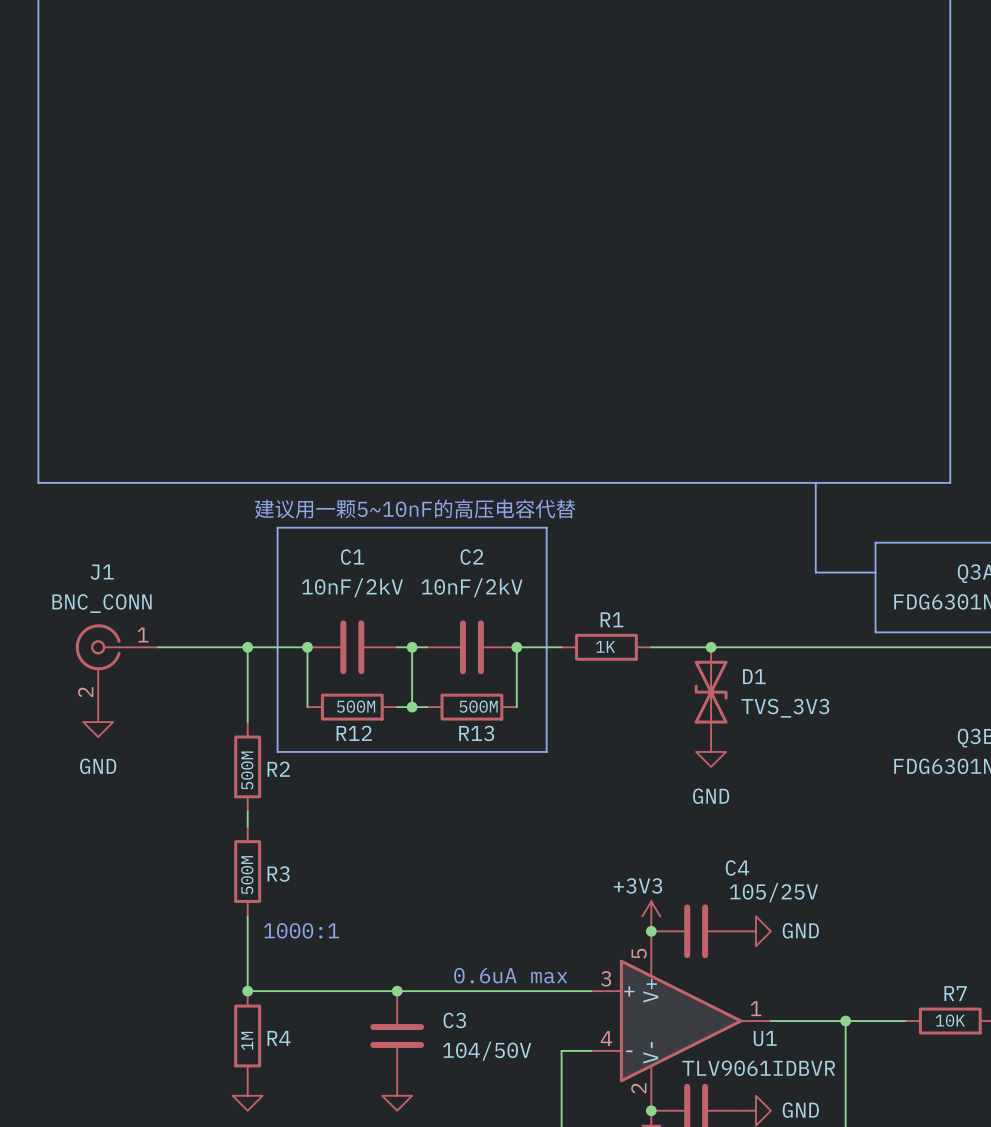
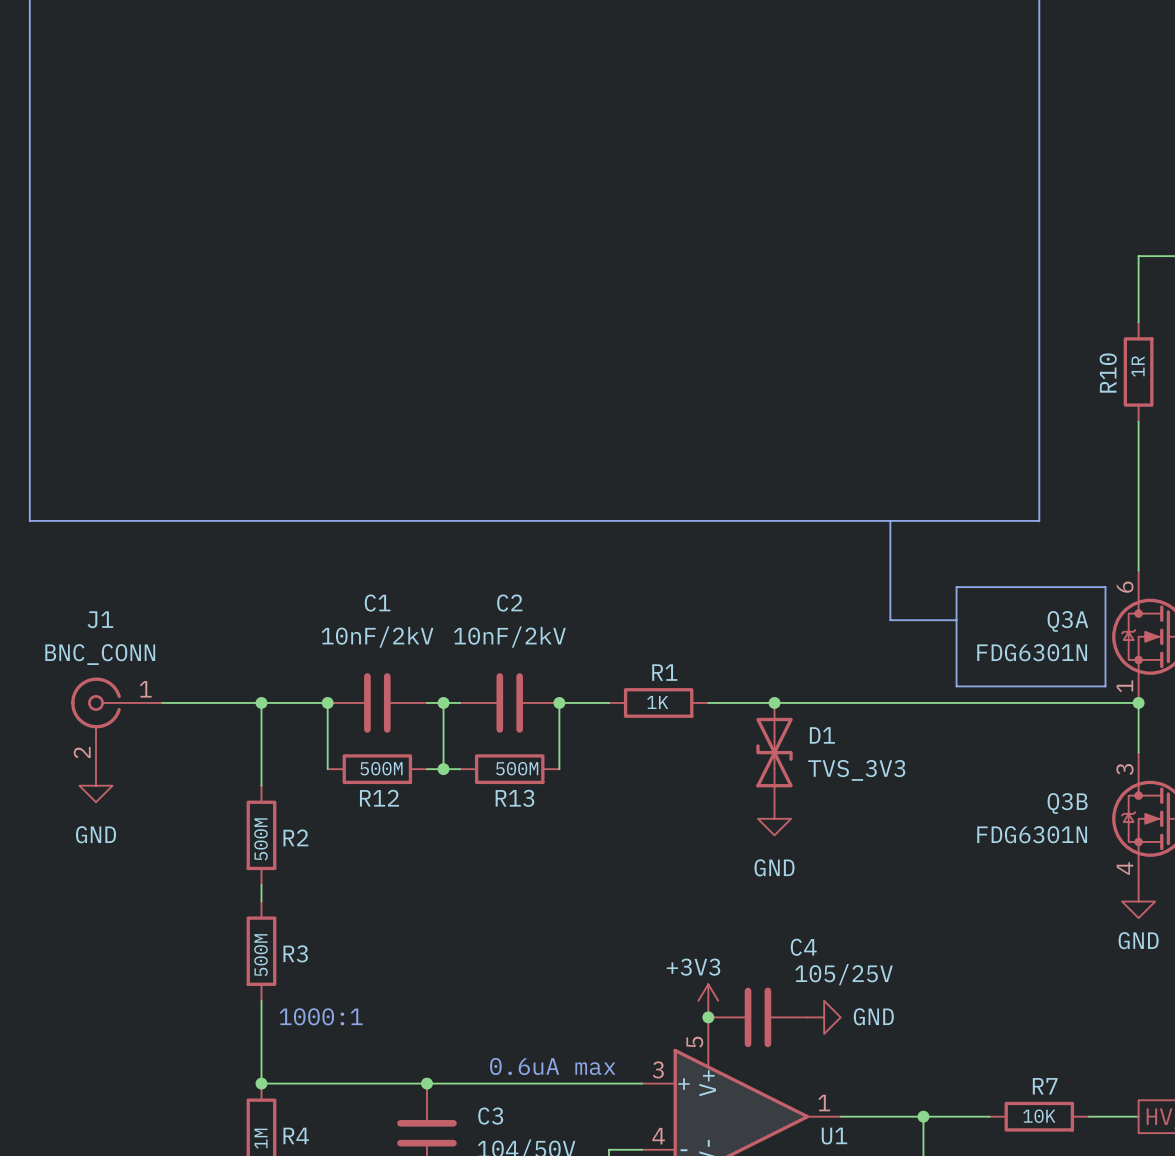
text: 建议用一颗5~10nF的高压电容代替 (415, 509) -> none
line: (277, 527) (546, 527) (546, 751) (277, 751) (277, 527) -> none

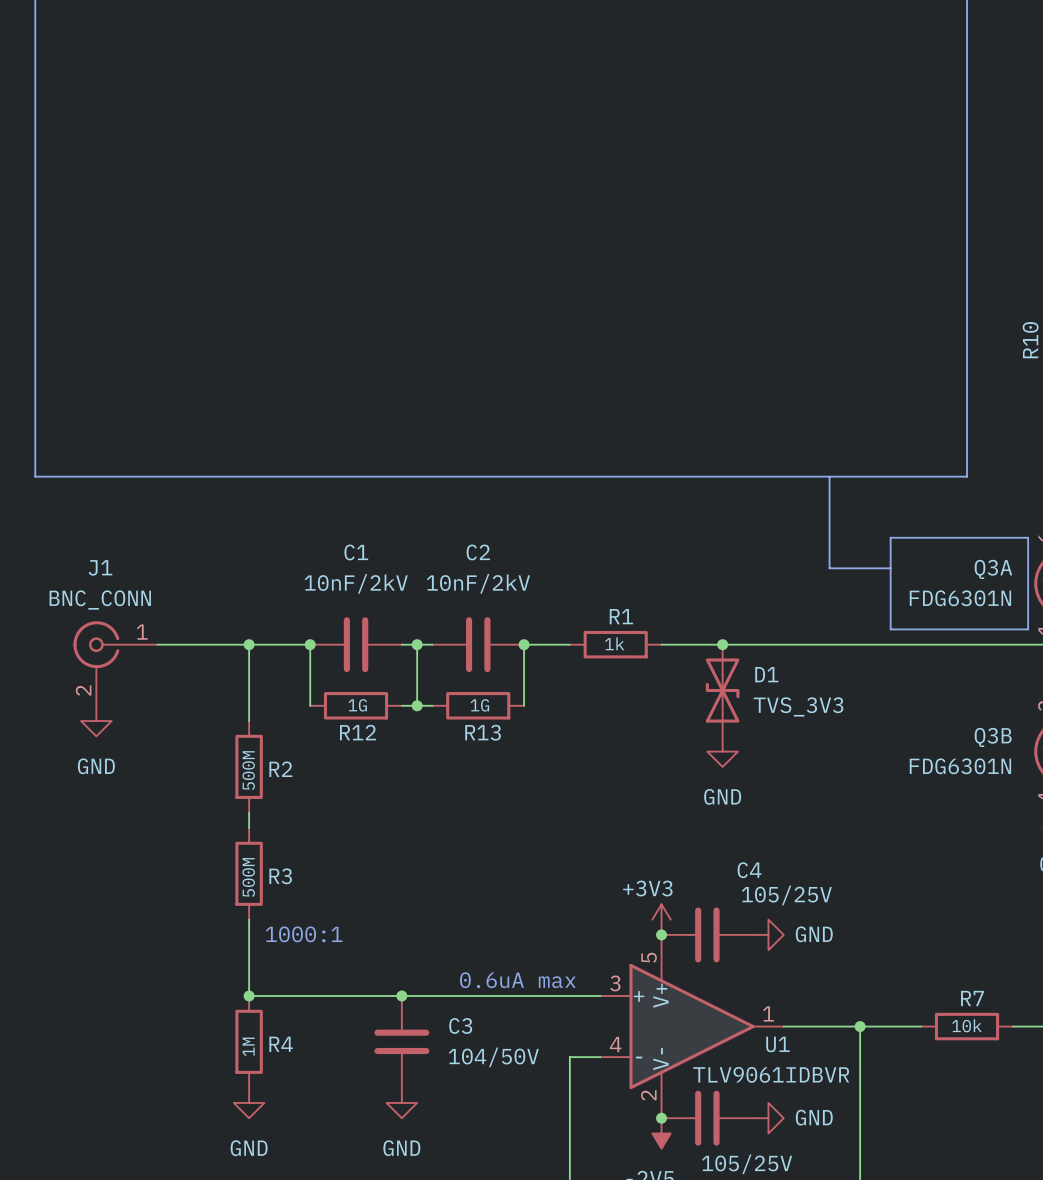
R1 value: 1K (657, 702) -> 1k (614, 643)
R12 value: 500M (381, 768) -> 1G (357, 705)
R13 value: 500M (517, 768) -> 1G (479, 705)
R7 value: 10K (1039, 1116) -> 10k (967, 1025)

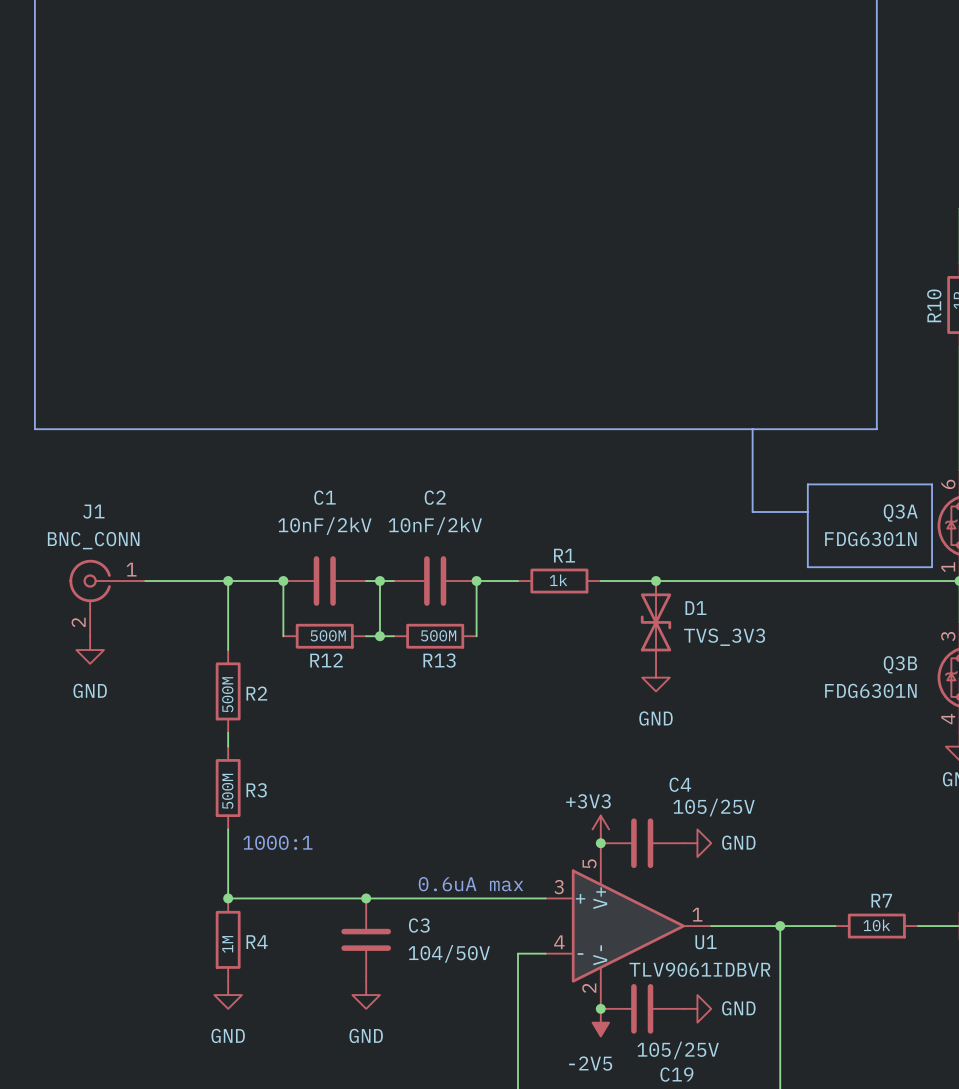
R12 value: 1G (357, 705) -> 500M (328, 635)
R13 value: 1G (479, 705) -> 500M (438, 635)

